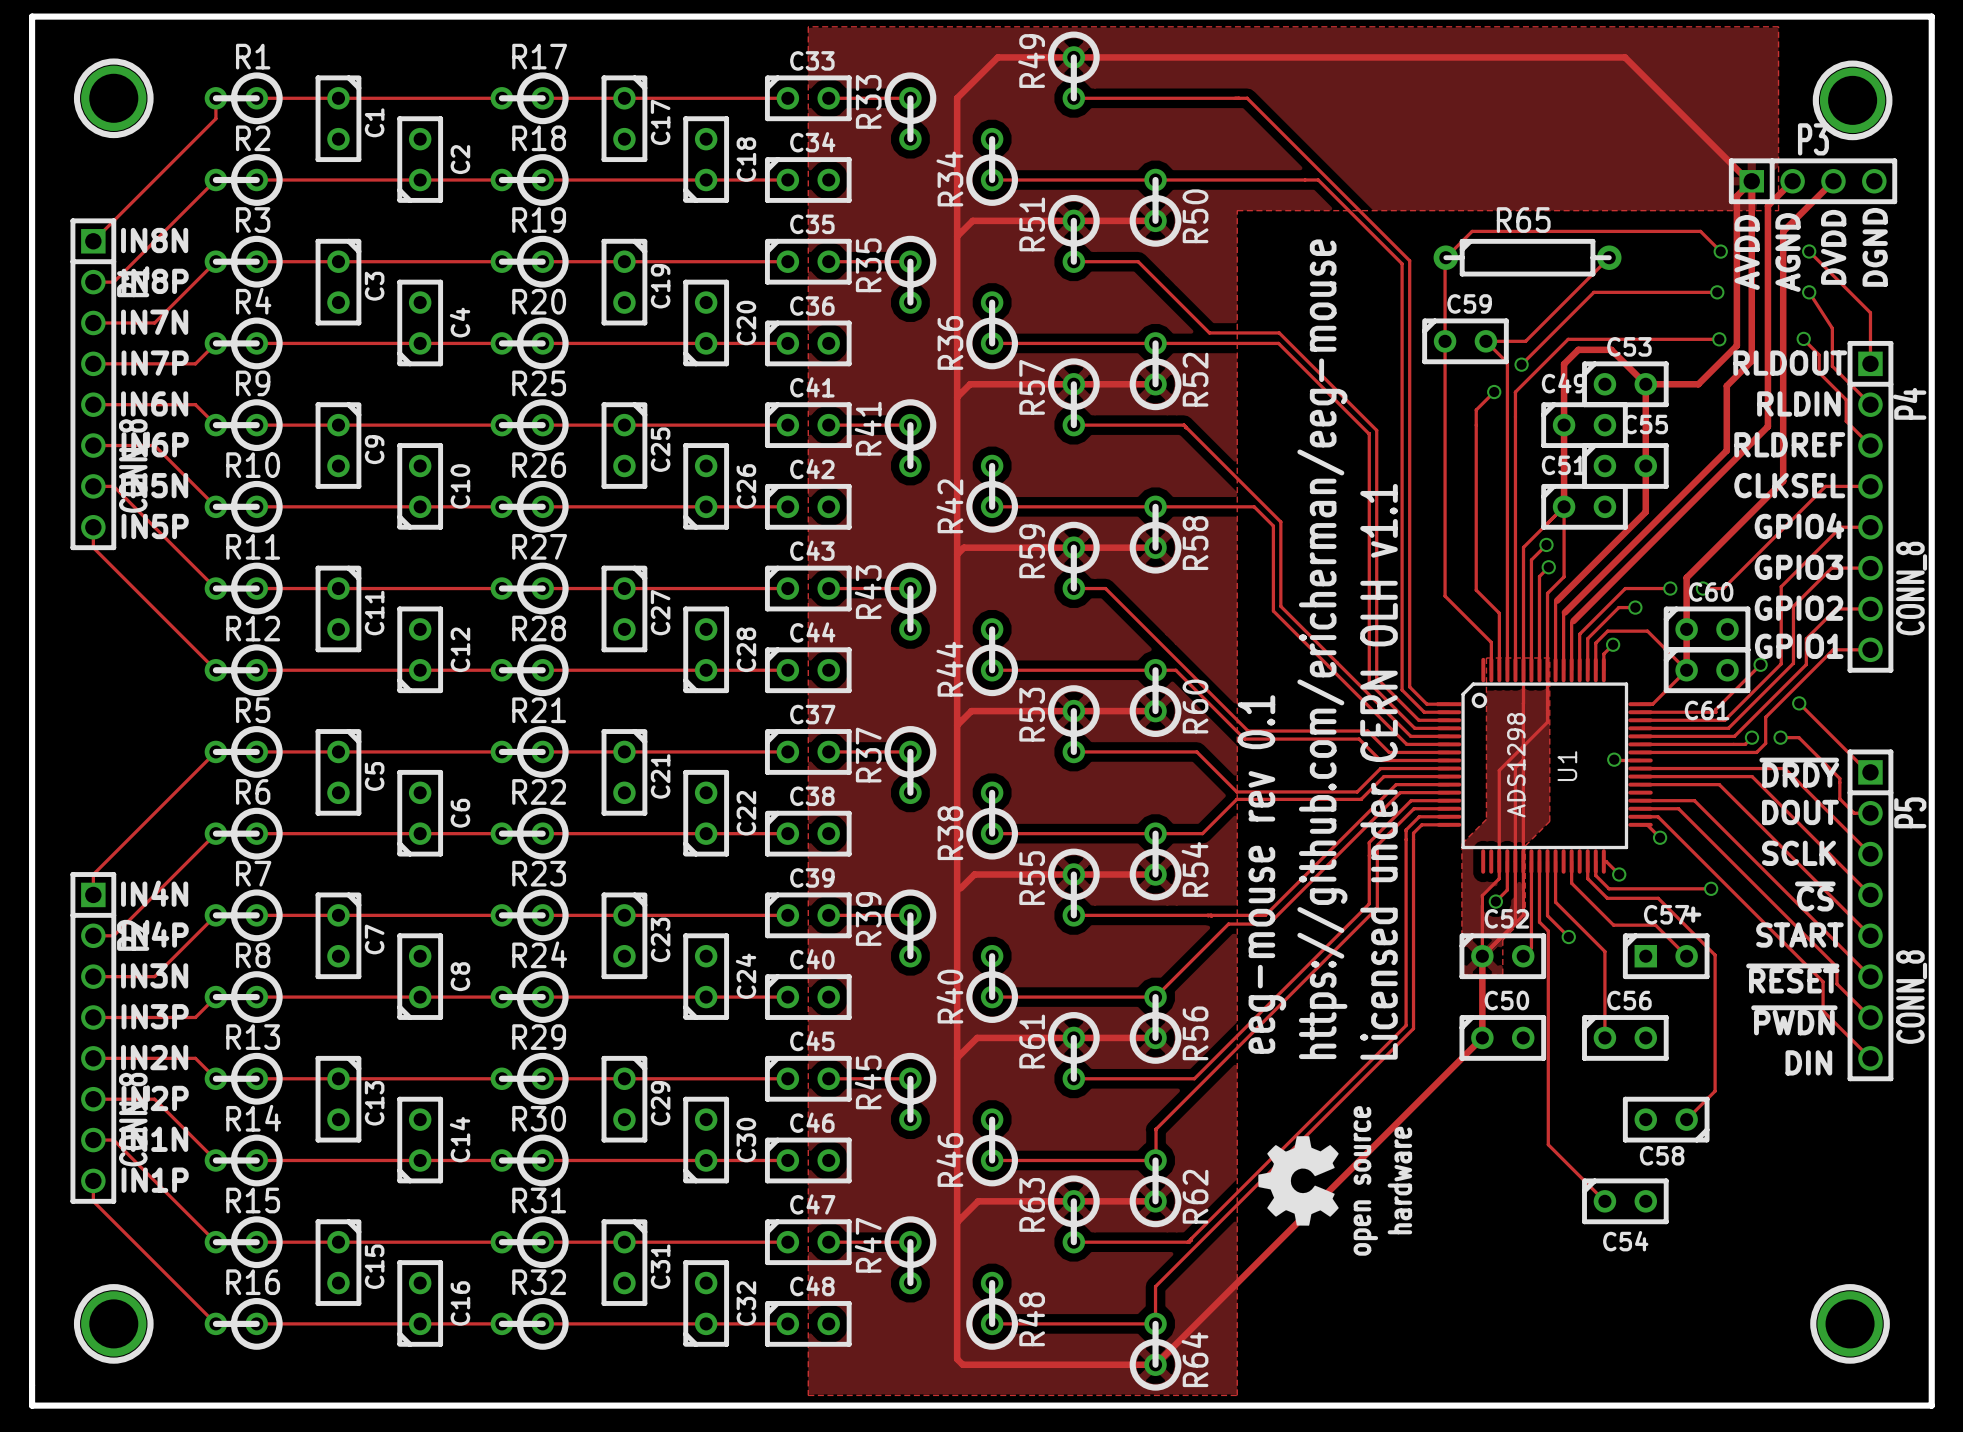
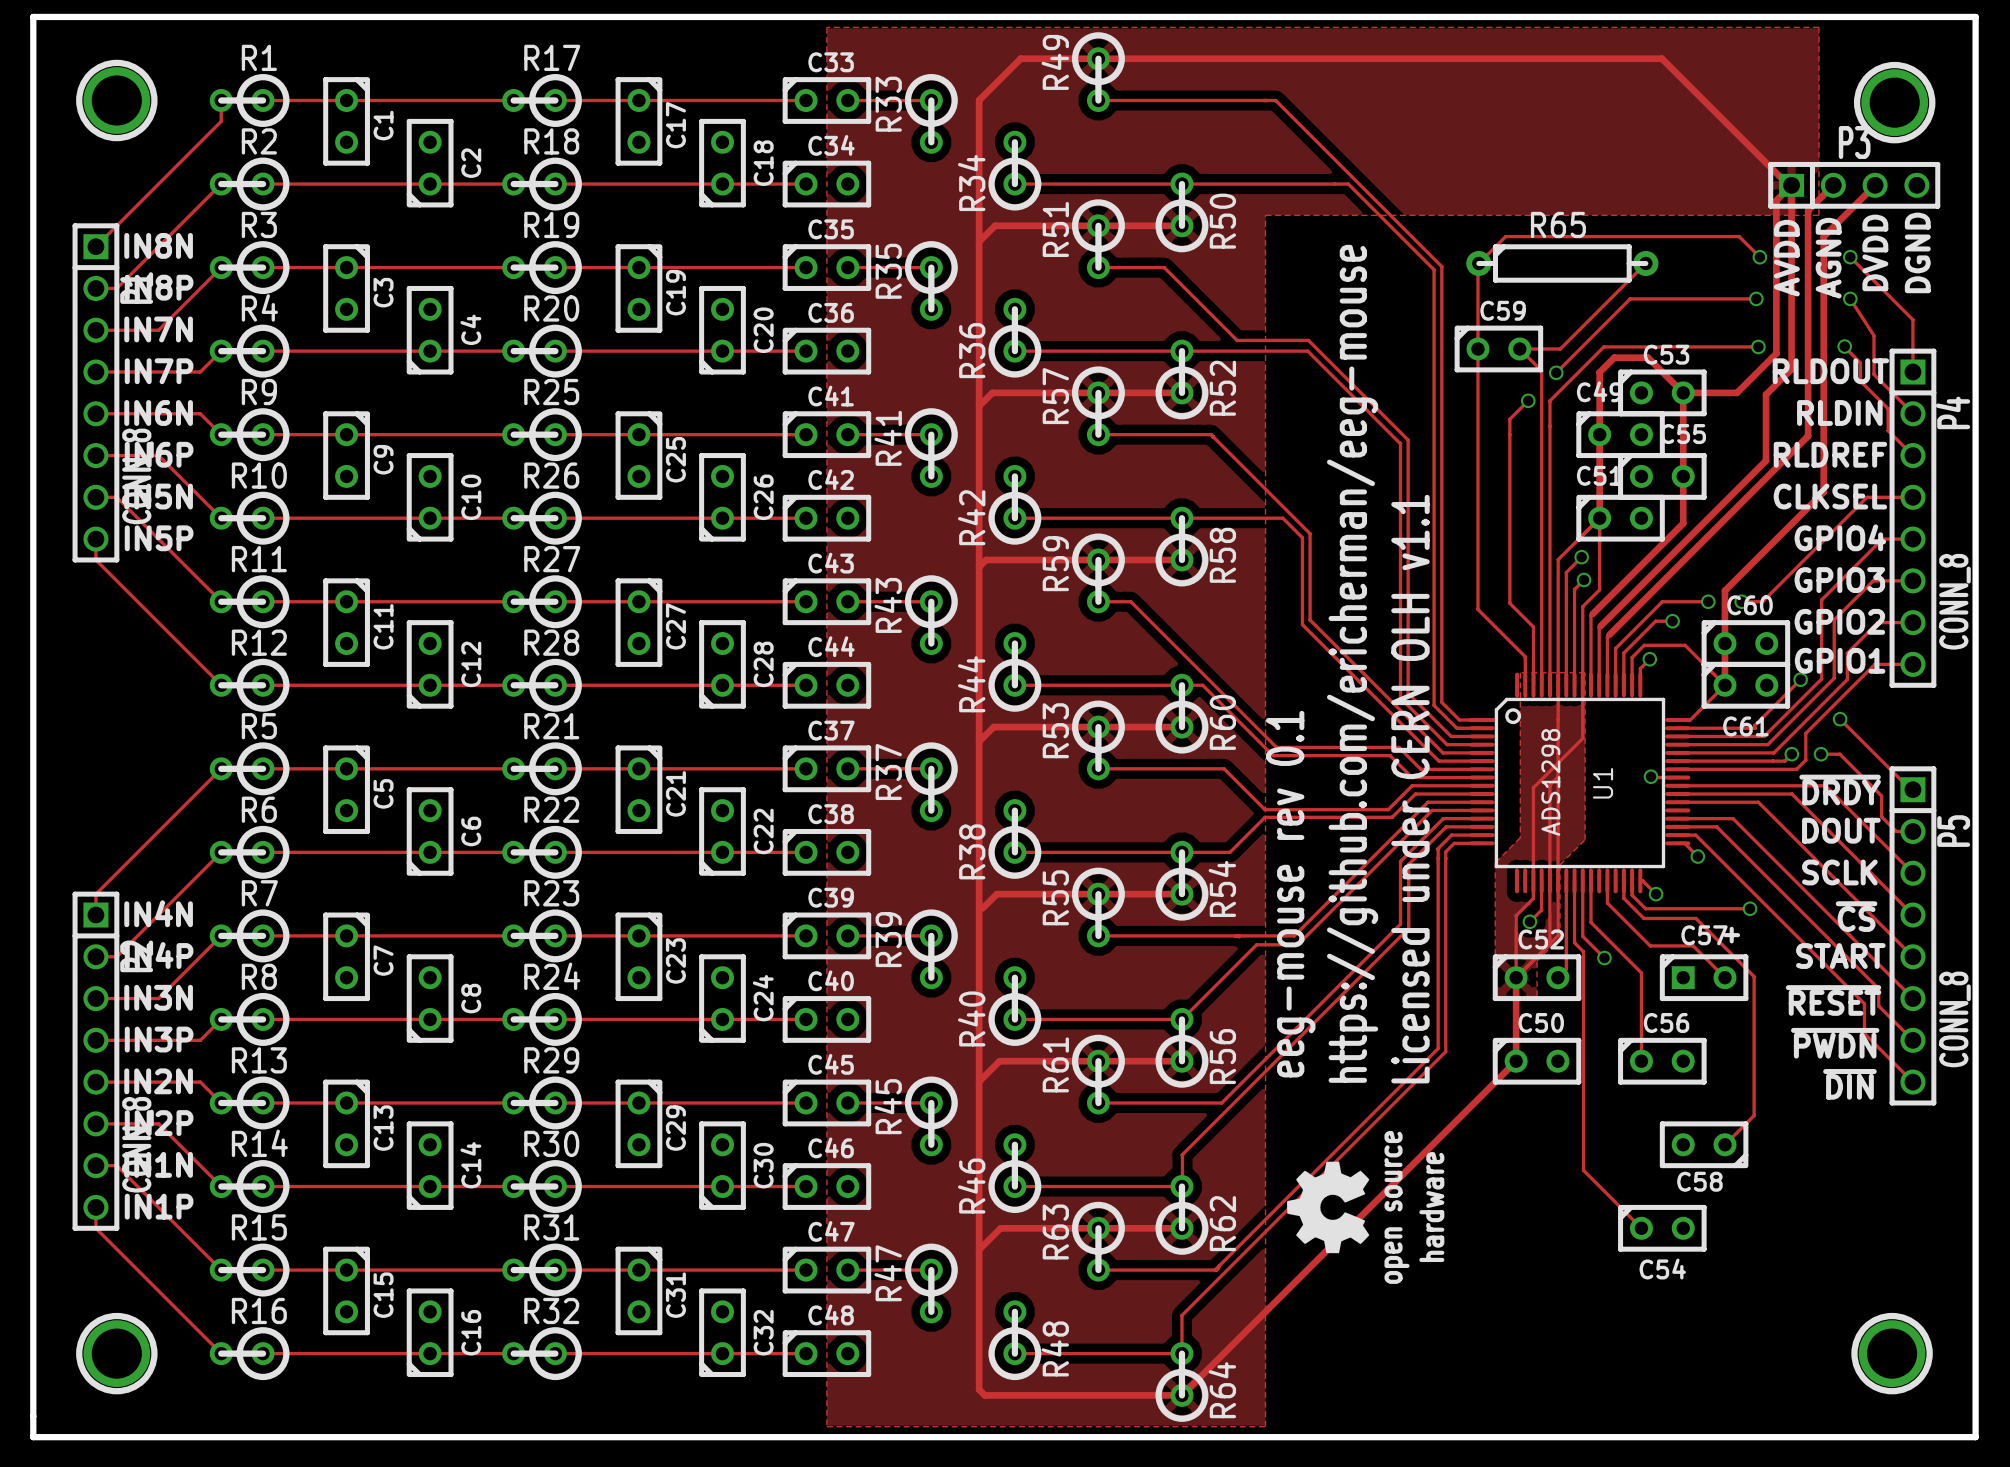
text: DIN (1808, 1062) -> ~{DIN} (1849, 1084)

